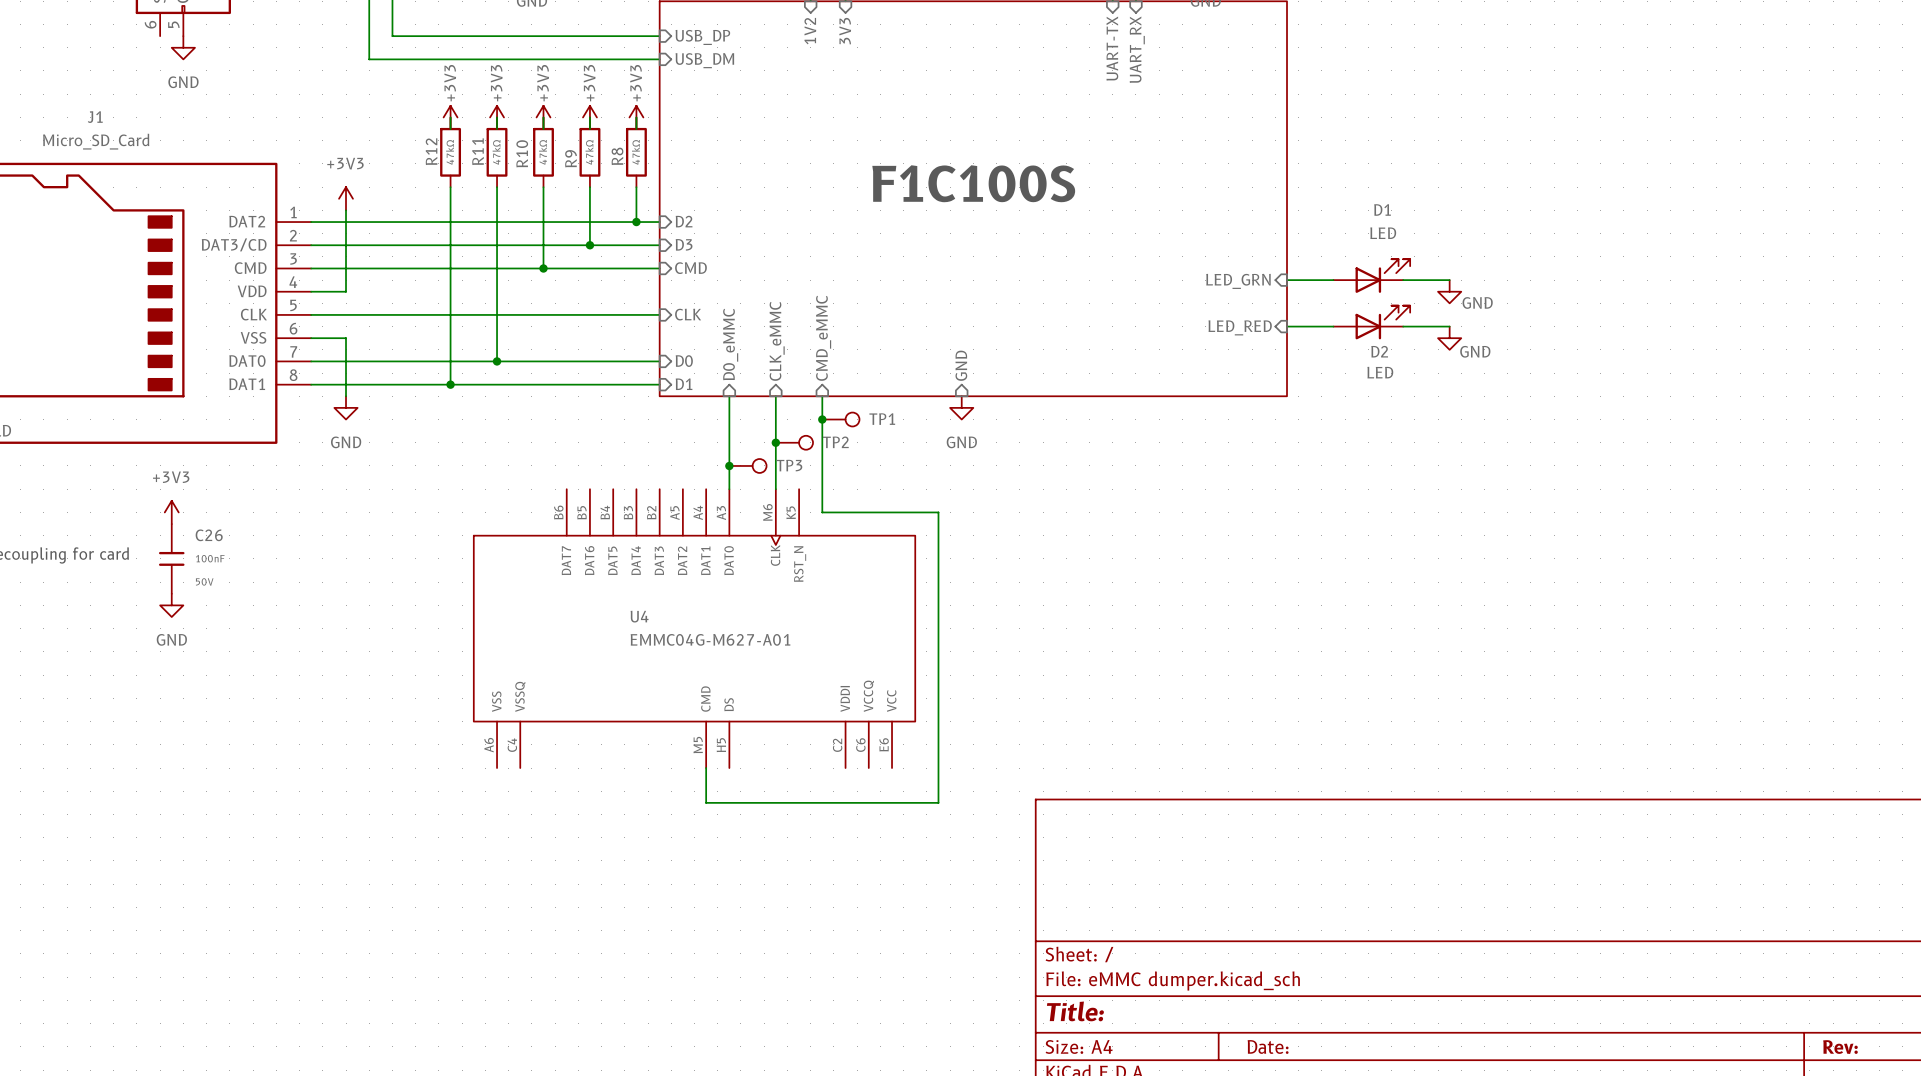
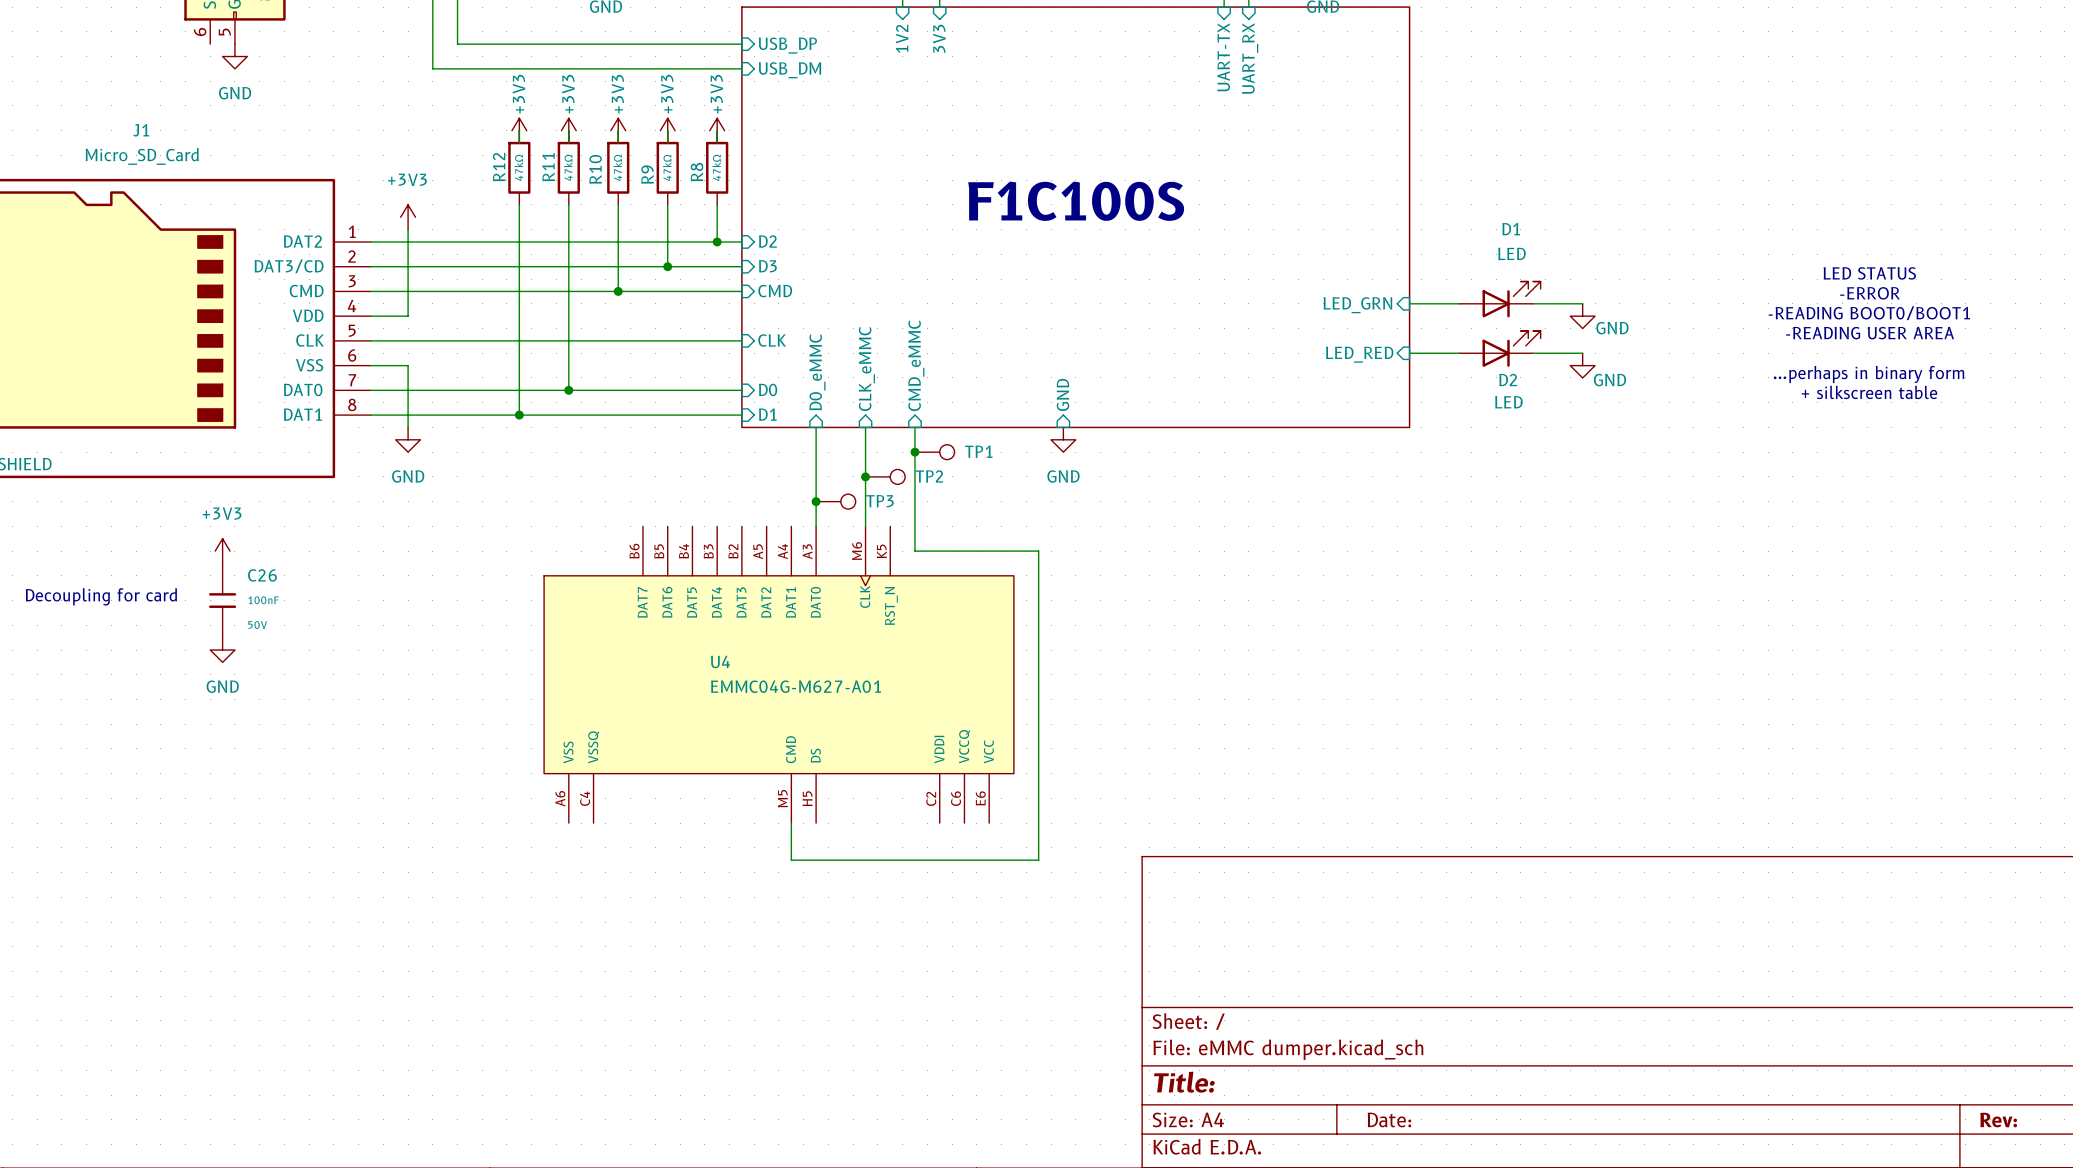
text: none -> LED STATUS (1869, 273)
text: none -> -ERROR (1870, 293)
text: none -> -READING BOOT0/BOOT1 (1869, 313)
text: none -> -READING USER AREA (1870, 333)
text: none -> ...perhaps in binary form (1869, 374)
text: none -> + silkscreen table (1869, 392)

